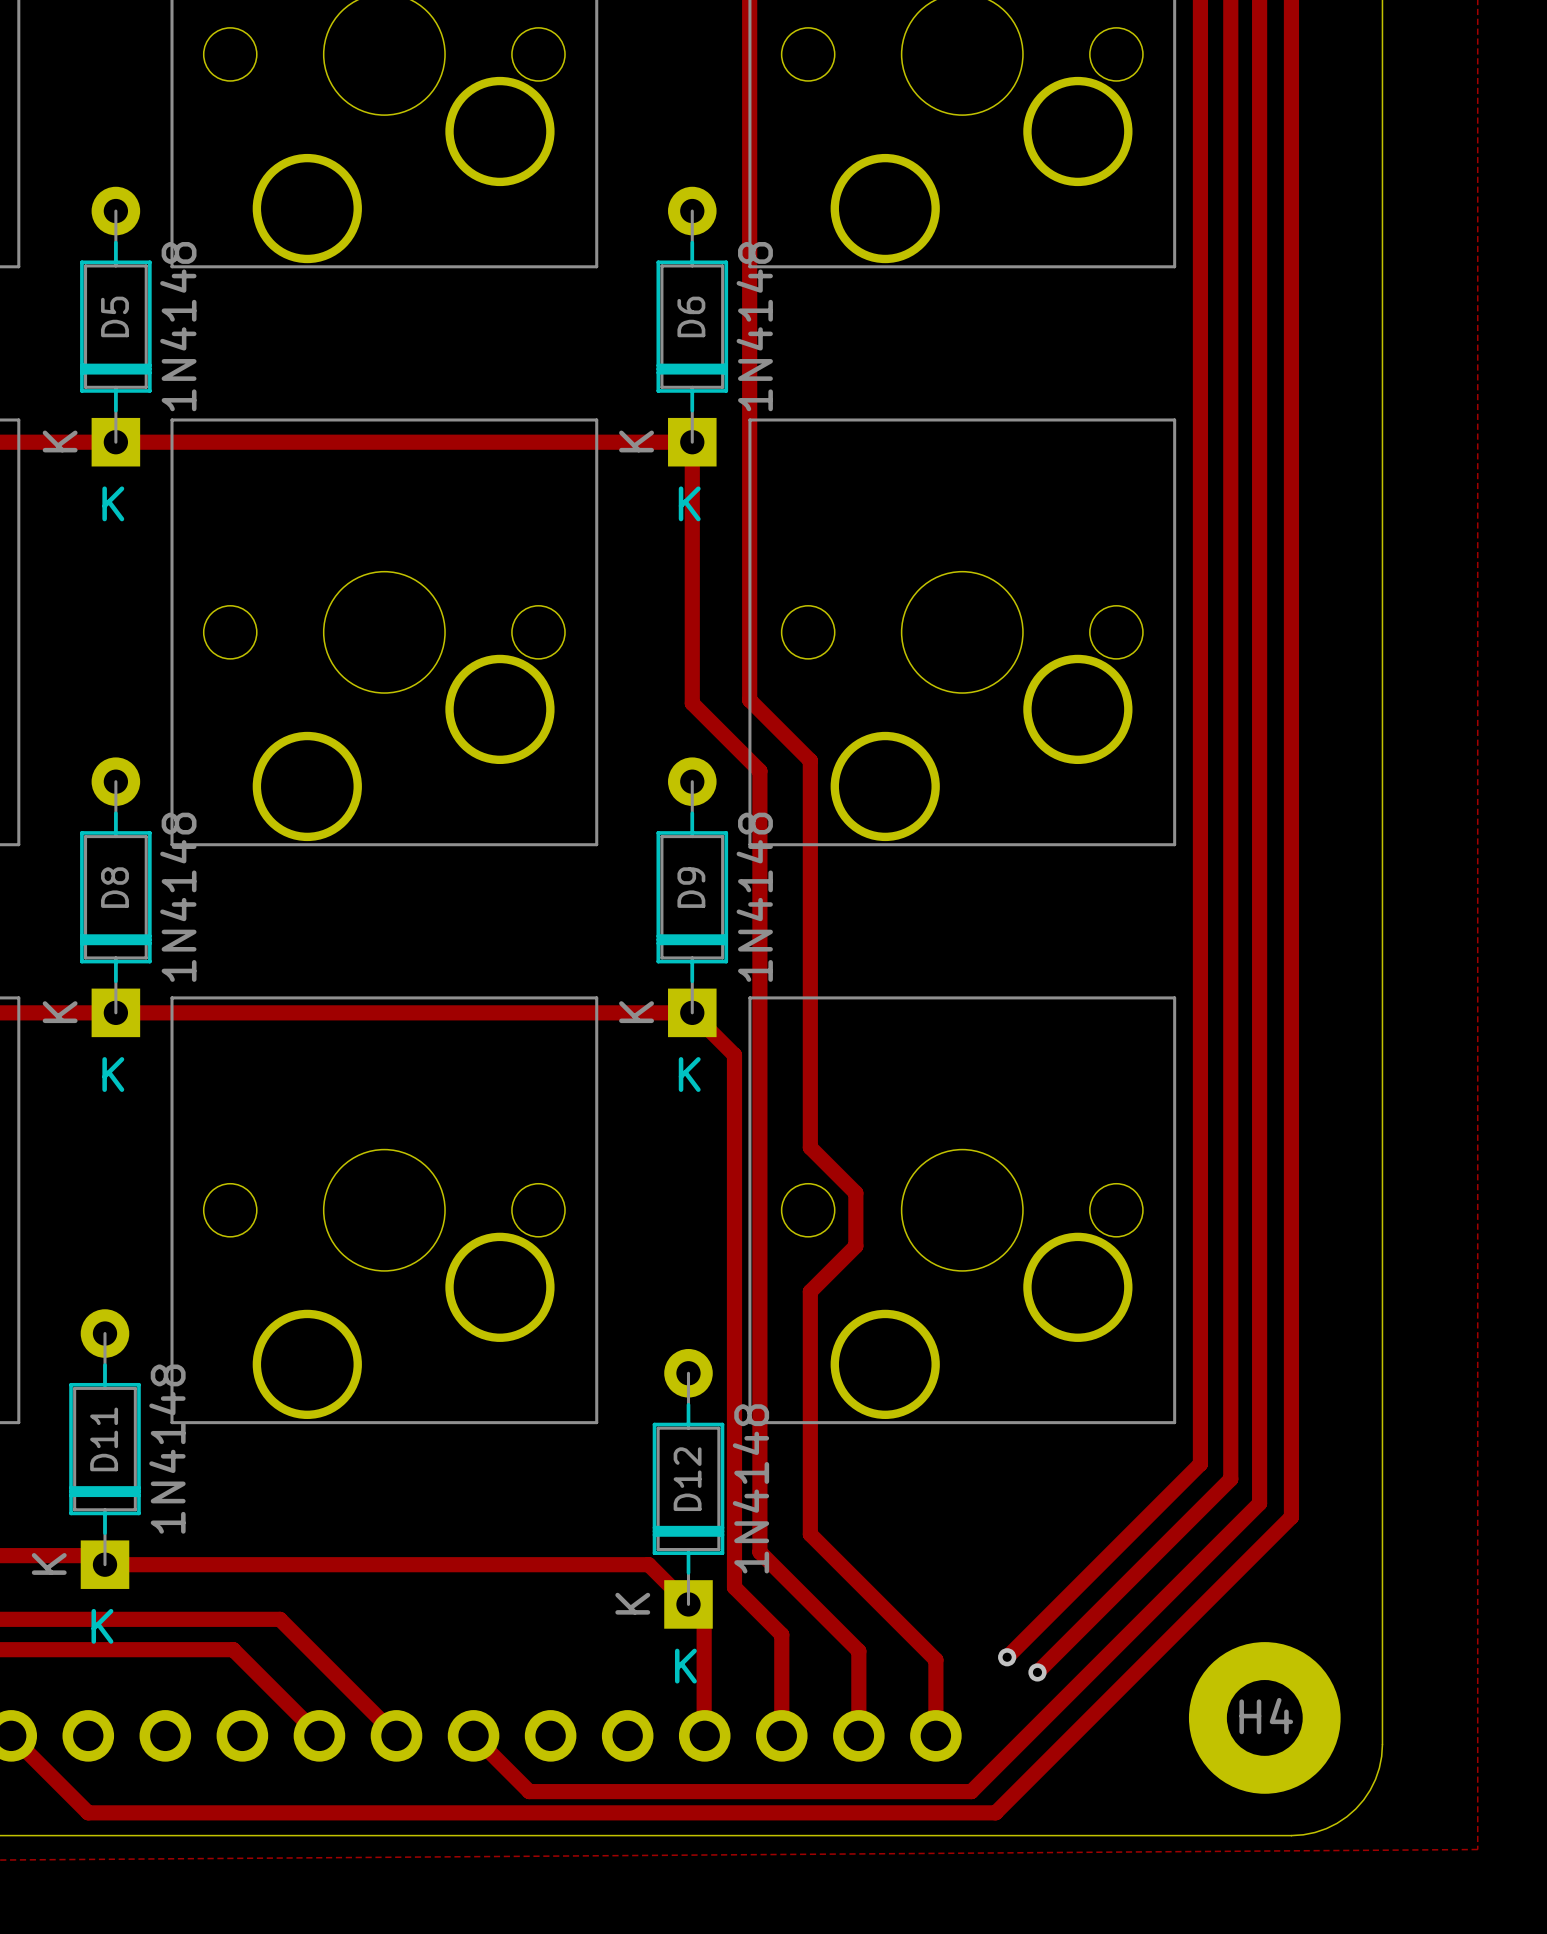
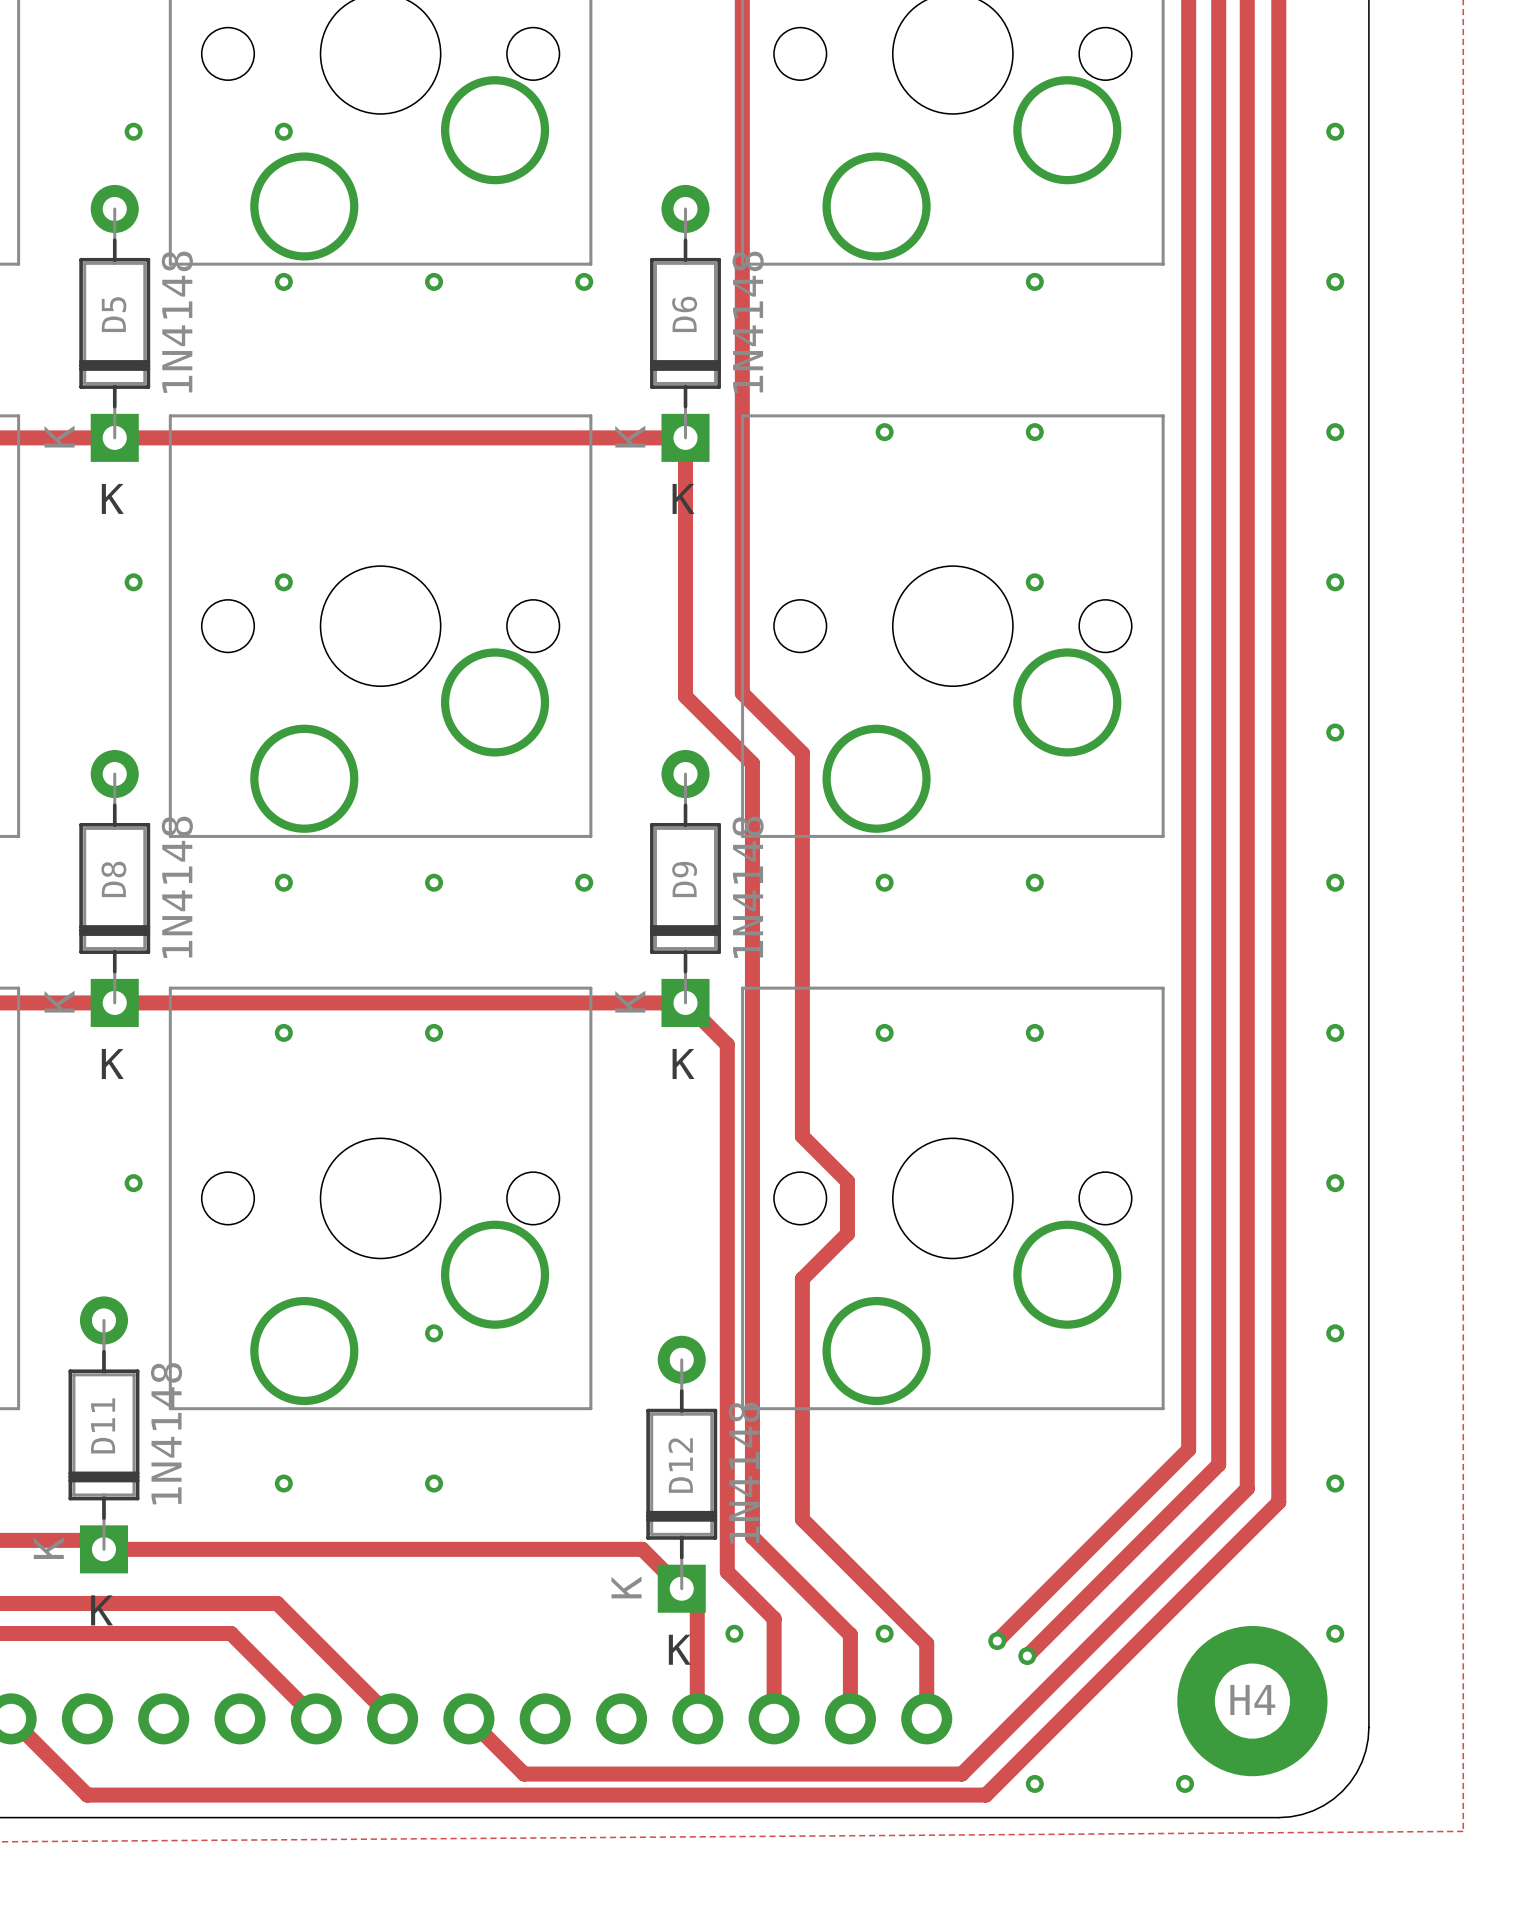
via: none -> (133, 131)
via: none -> (283, 131)
via: none -> (1335, 131)
via: none -> (283, 281)
via: none -> (434, 281)
via: none -> (584, 281)
via: none -> (1034, 281)
via: none -> (1335, 281)
via: none -> (884, 432)
via: none -> (1034, 432)
via: none -> (1335, 432)
via: none -> (133, 582)
via: none -> (283, 582)
via: none -> (1034, 582)
via: none -> (1335, 582)
via: none -> (1335, 732)
via: none -> (283, 882)
via: none -> (434, 882)
via: none -> (584, 882)
via: none -> (884, 882)
via: none -> (1034, 882)
via: none -> (1335, 882)
via: none -> (283, 1032)
via: none -> (434, 1032)
via: none -> (884, 1032)
via: none -> (1034, 1032)
via: none -> (1335, 1032)
via: none -> (133, 1183)
via: none -> (1335, 1183)
via: none -> (434, 1333)
via: none -> (1335, 1333)
via: none -> (283, 1483)
via: none -> (434, 1483)
via: none -> (1335, 1483)
via: none -> (734, 1633)
via: none -> (884, 1633)
via: none -> (1335, 1633)
via: none -> (1034, 1783)
via: none -> (1185, 1783)

